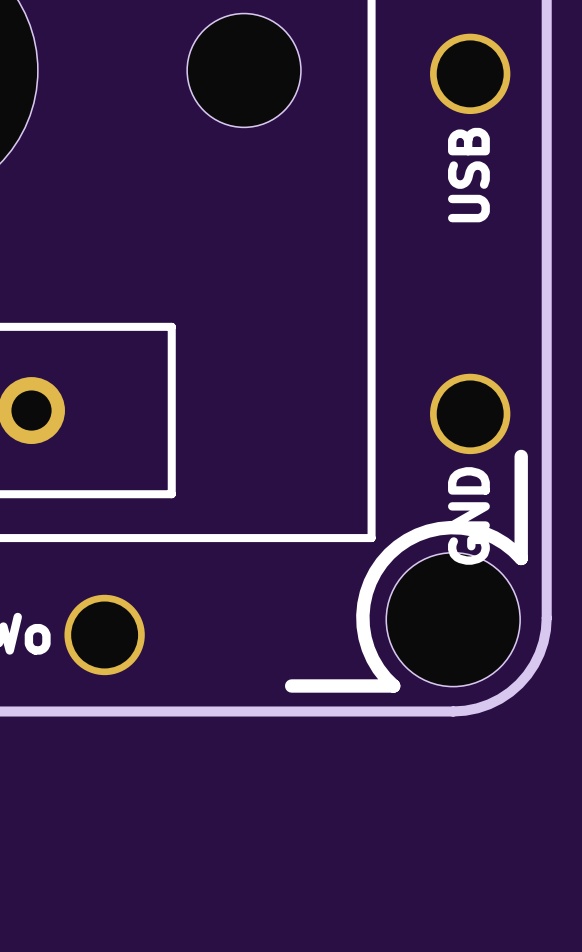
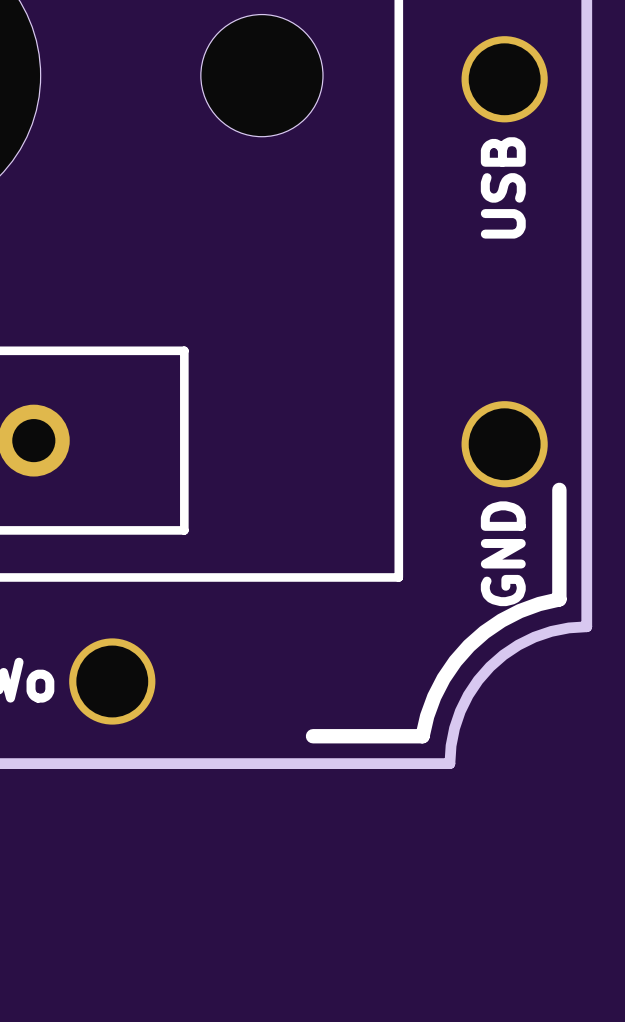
line: (521, 558) (494, 537) (473, 529) (450, 527) (417, 535) (389, 554) (375, 572) (366, 592) (363, 626) (372, 659) (393, 685) -> (559, 599) (539, 604) (501, 620) (469, 645) (443, 678) (427, 716) (422, 736)
board edge: (546, 583) (546, 617) (543, 642) (534, 664) (519, 684) (499, 698) (477, 708) (453, 711) (419, 711) -> (586, 626) (568, 627) (534, 637) (503, 655) (489, 666) (468, 695) (460, 711) (451, 745) (449, 763)
part: (453, 619) -> none

